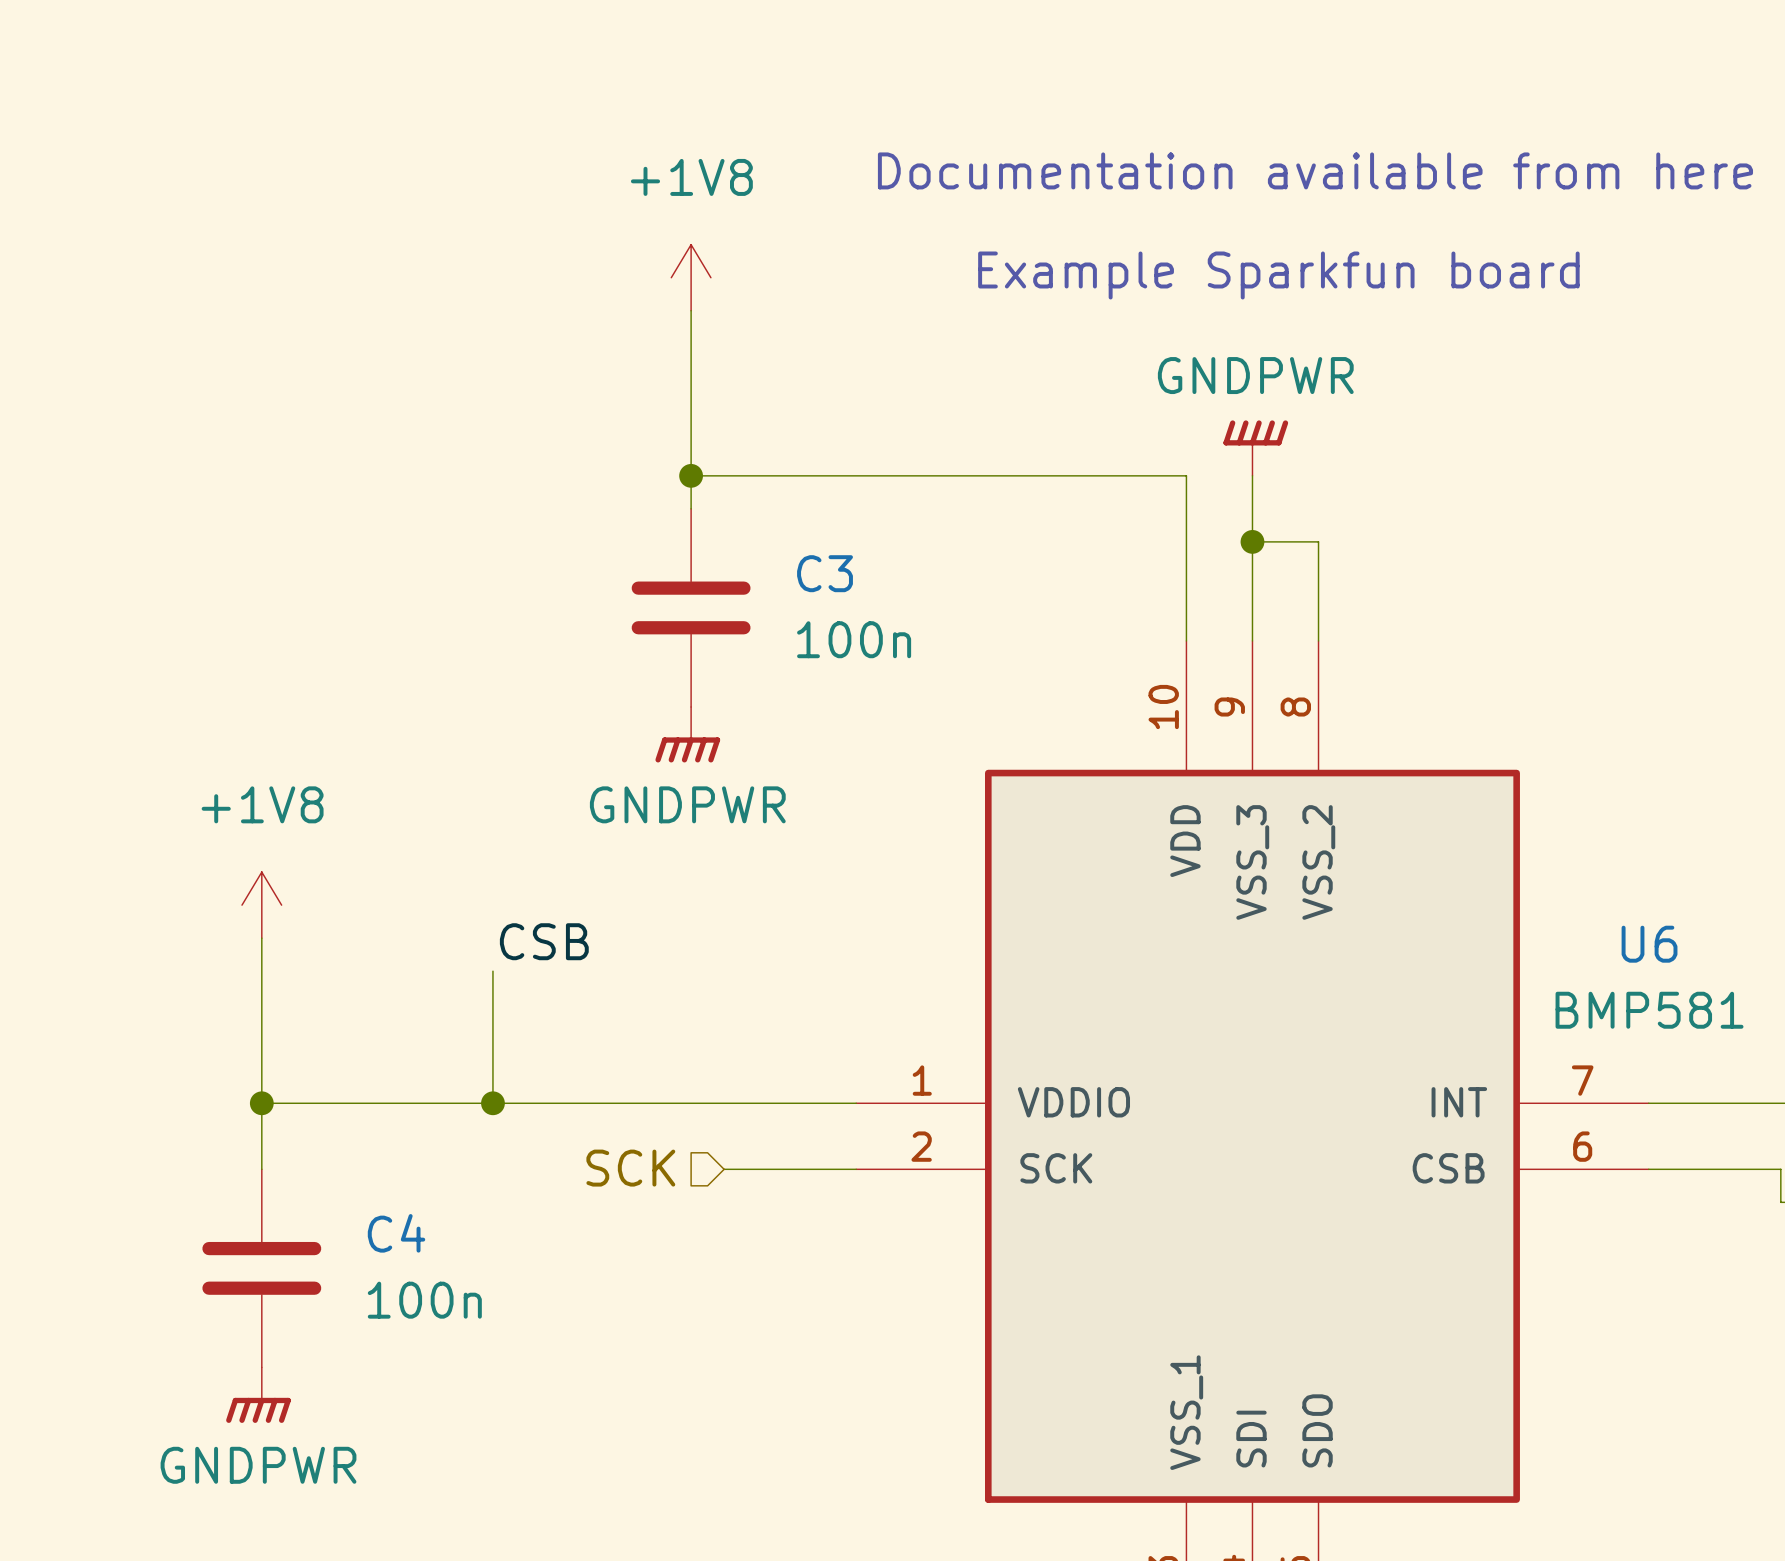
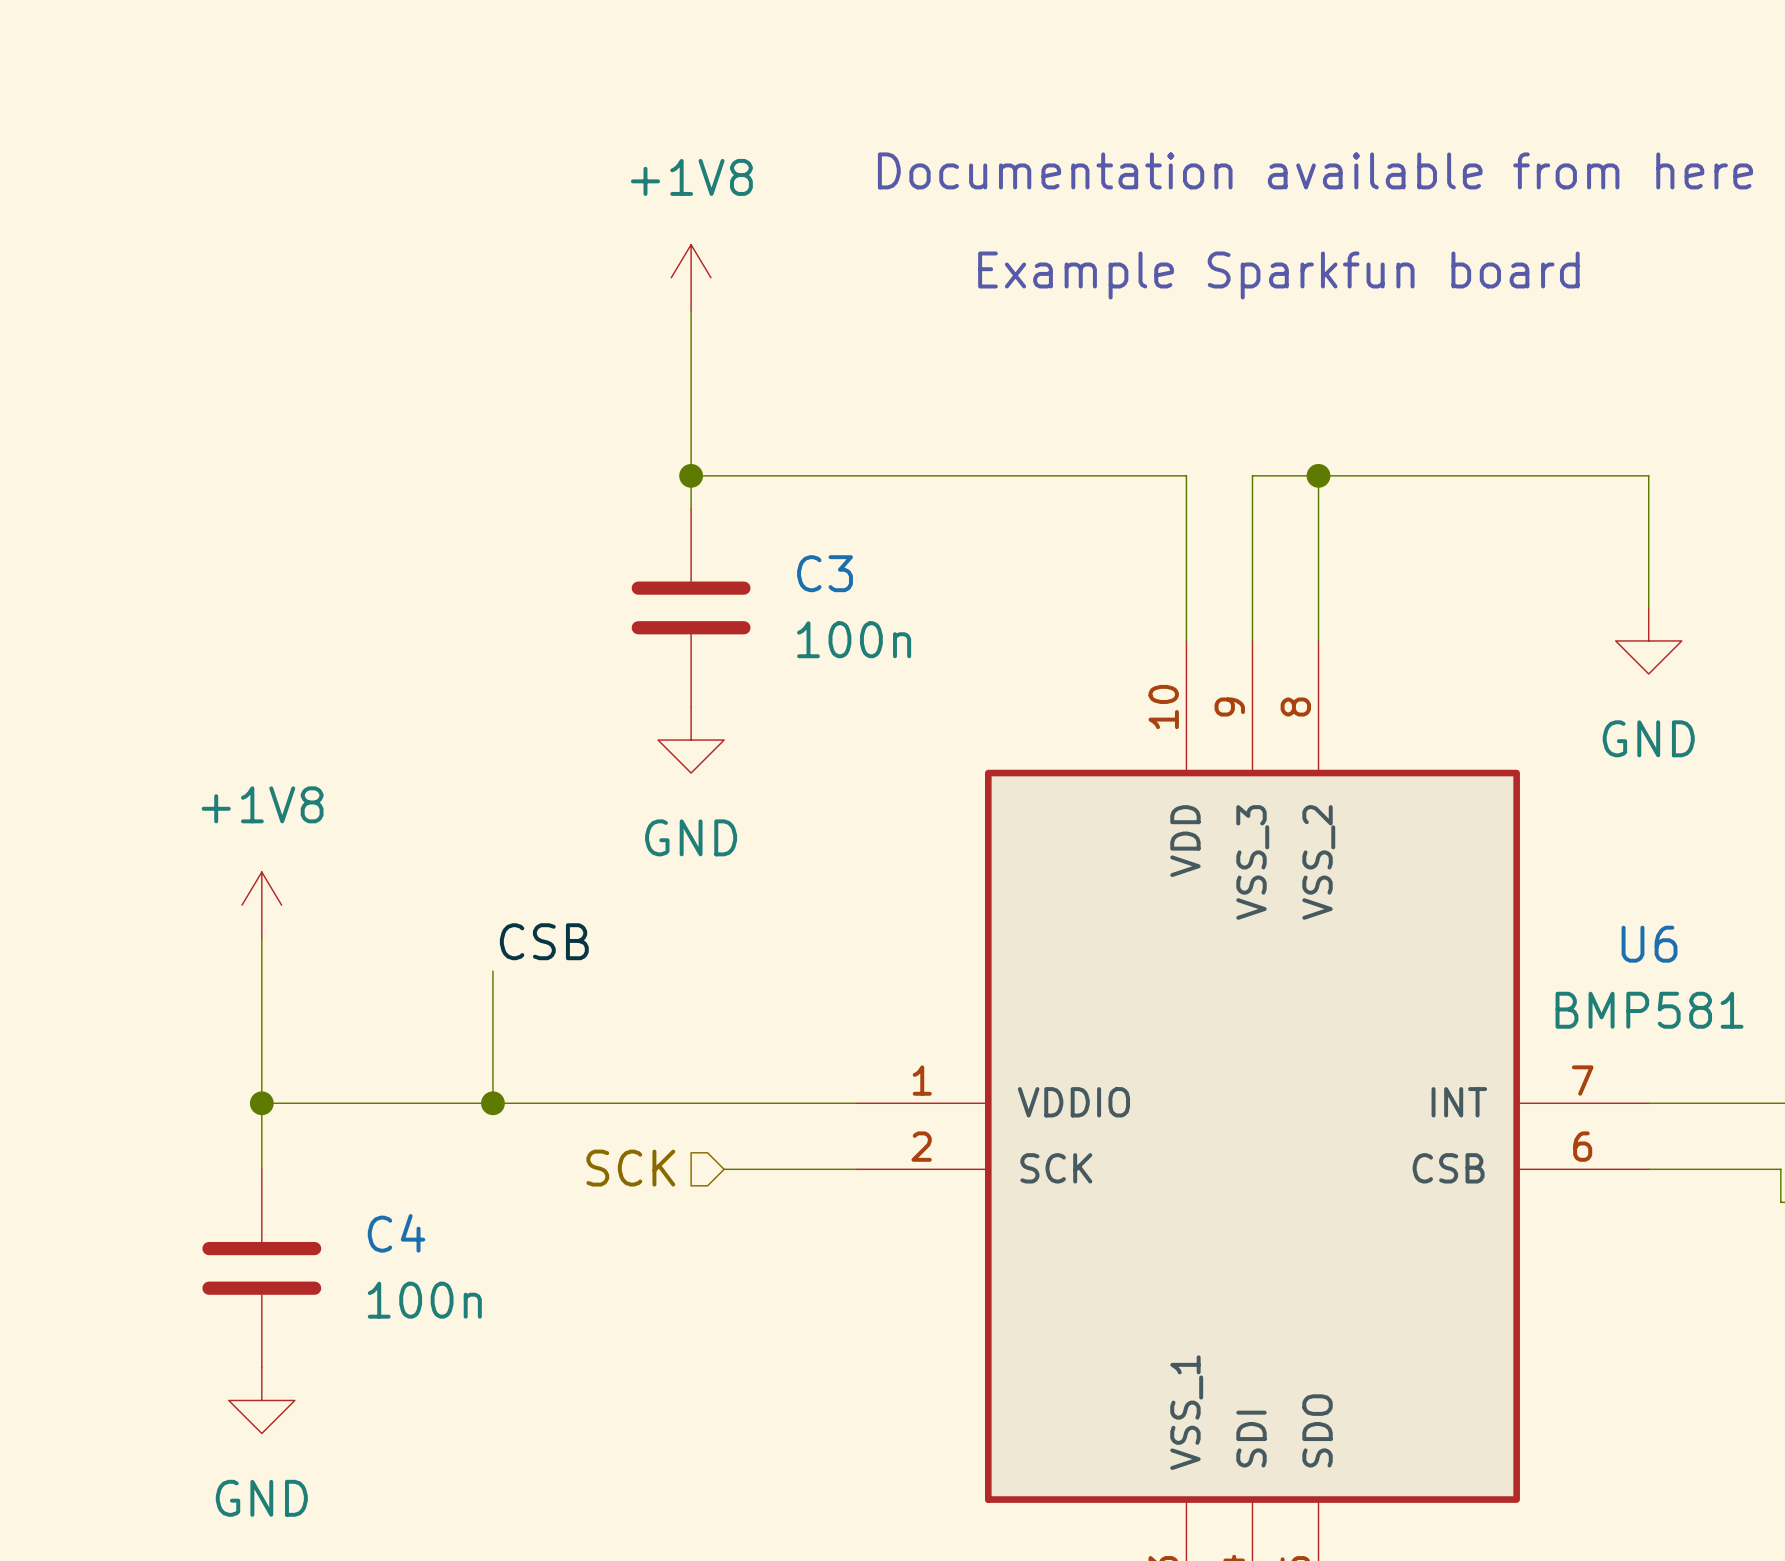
power symbol: GNDPWR (1255, 448) -> none
wire: none -> (1252, 475) (1648, 475) (1648, 607)
wire: (1252, 541) (1318, 541) -> (1318, 475) (1318, 541)
junction position: (1252, 541) -> (1318, 475)
power symbol: none -> GND (1648, 640)
power symbol: GNDPWR (687, 734) -> GND (691, 740)
power symbol: GNDPWR (258, 1395) -> GND (261, 1400)

